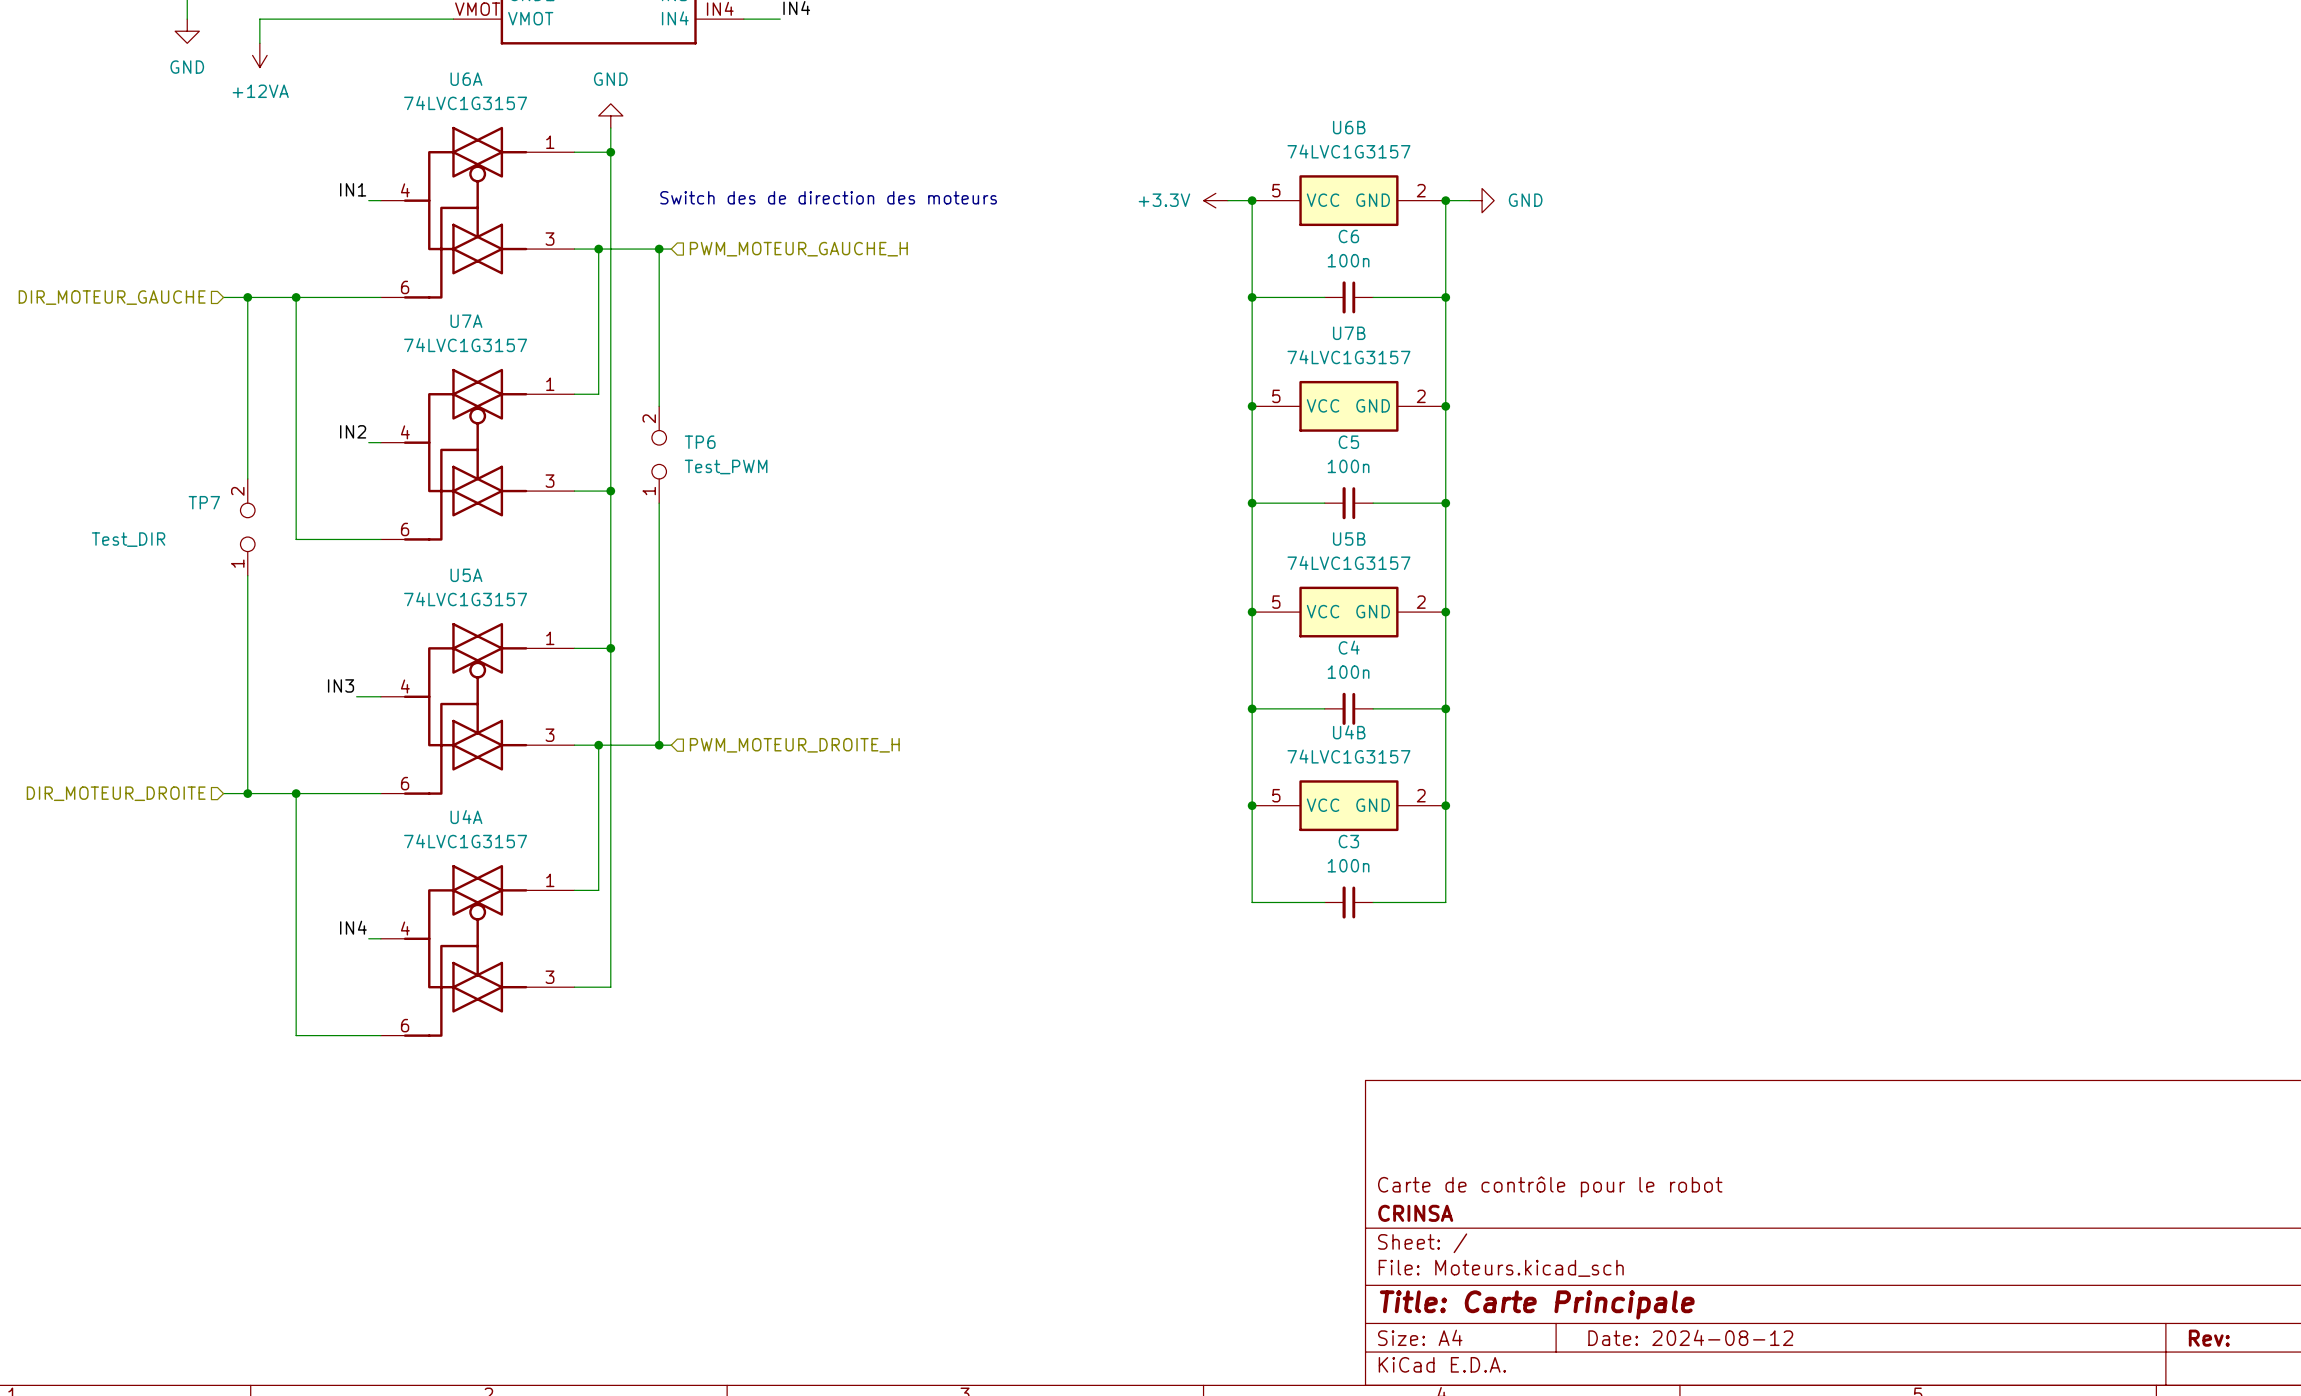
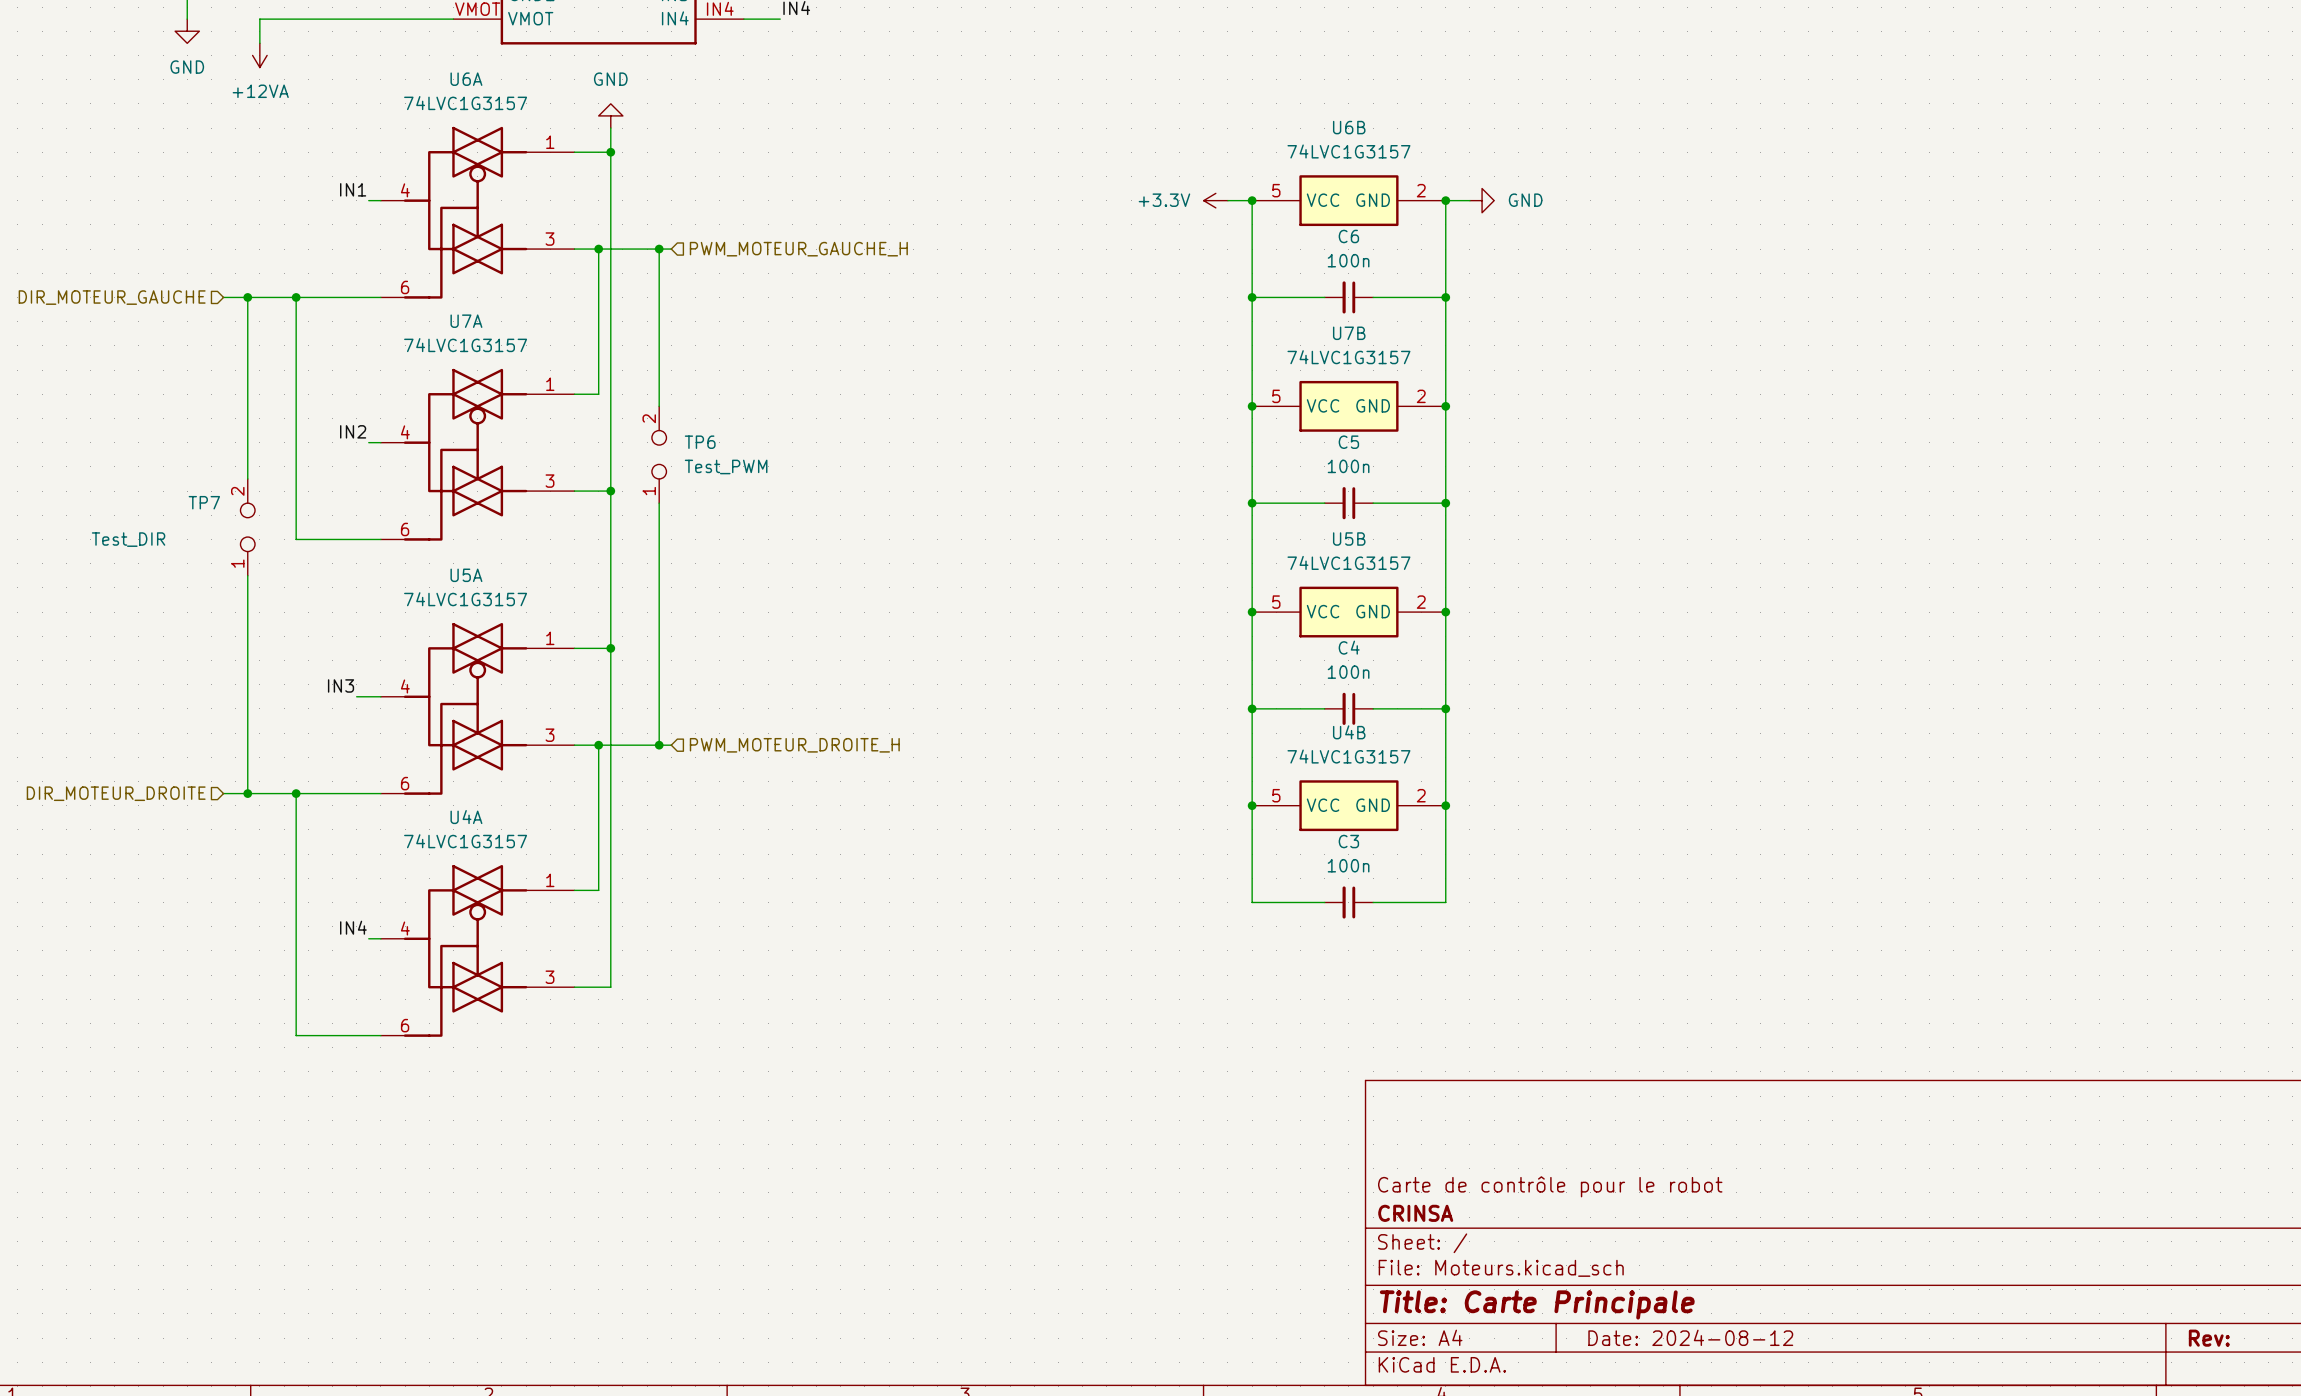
text: Switch des de direction des moteurs (828, 197) -> none

